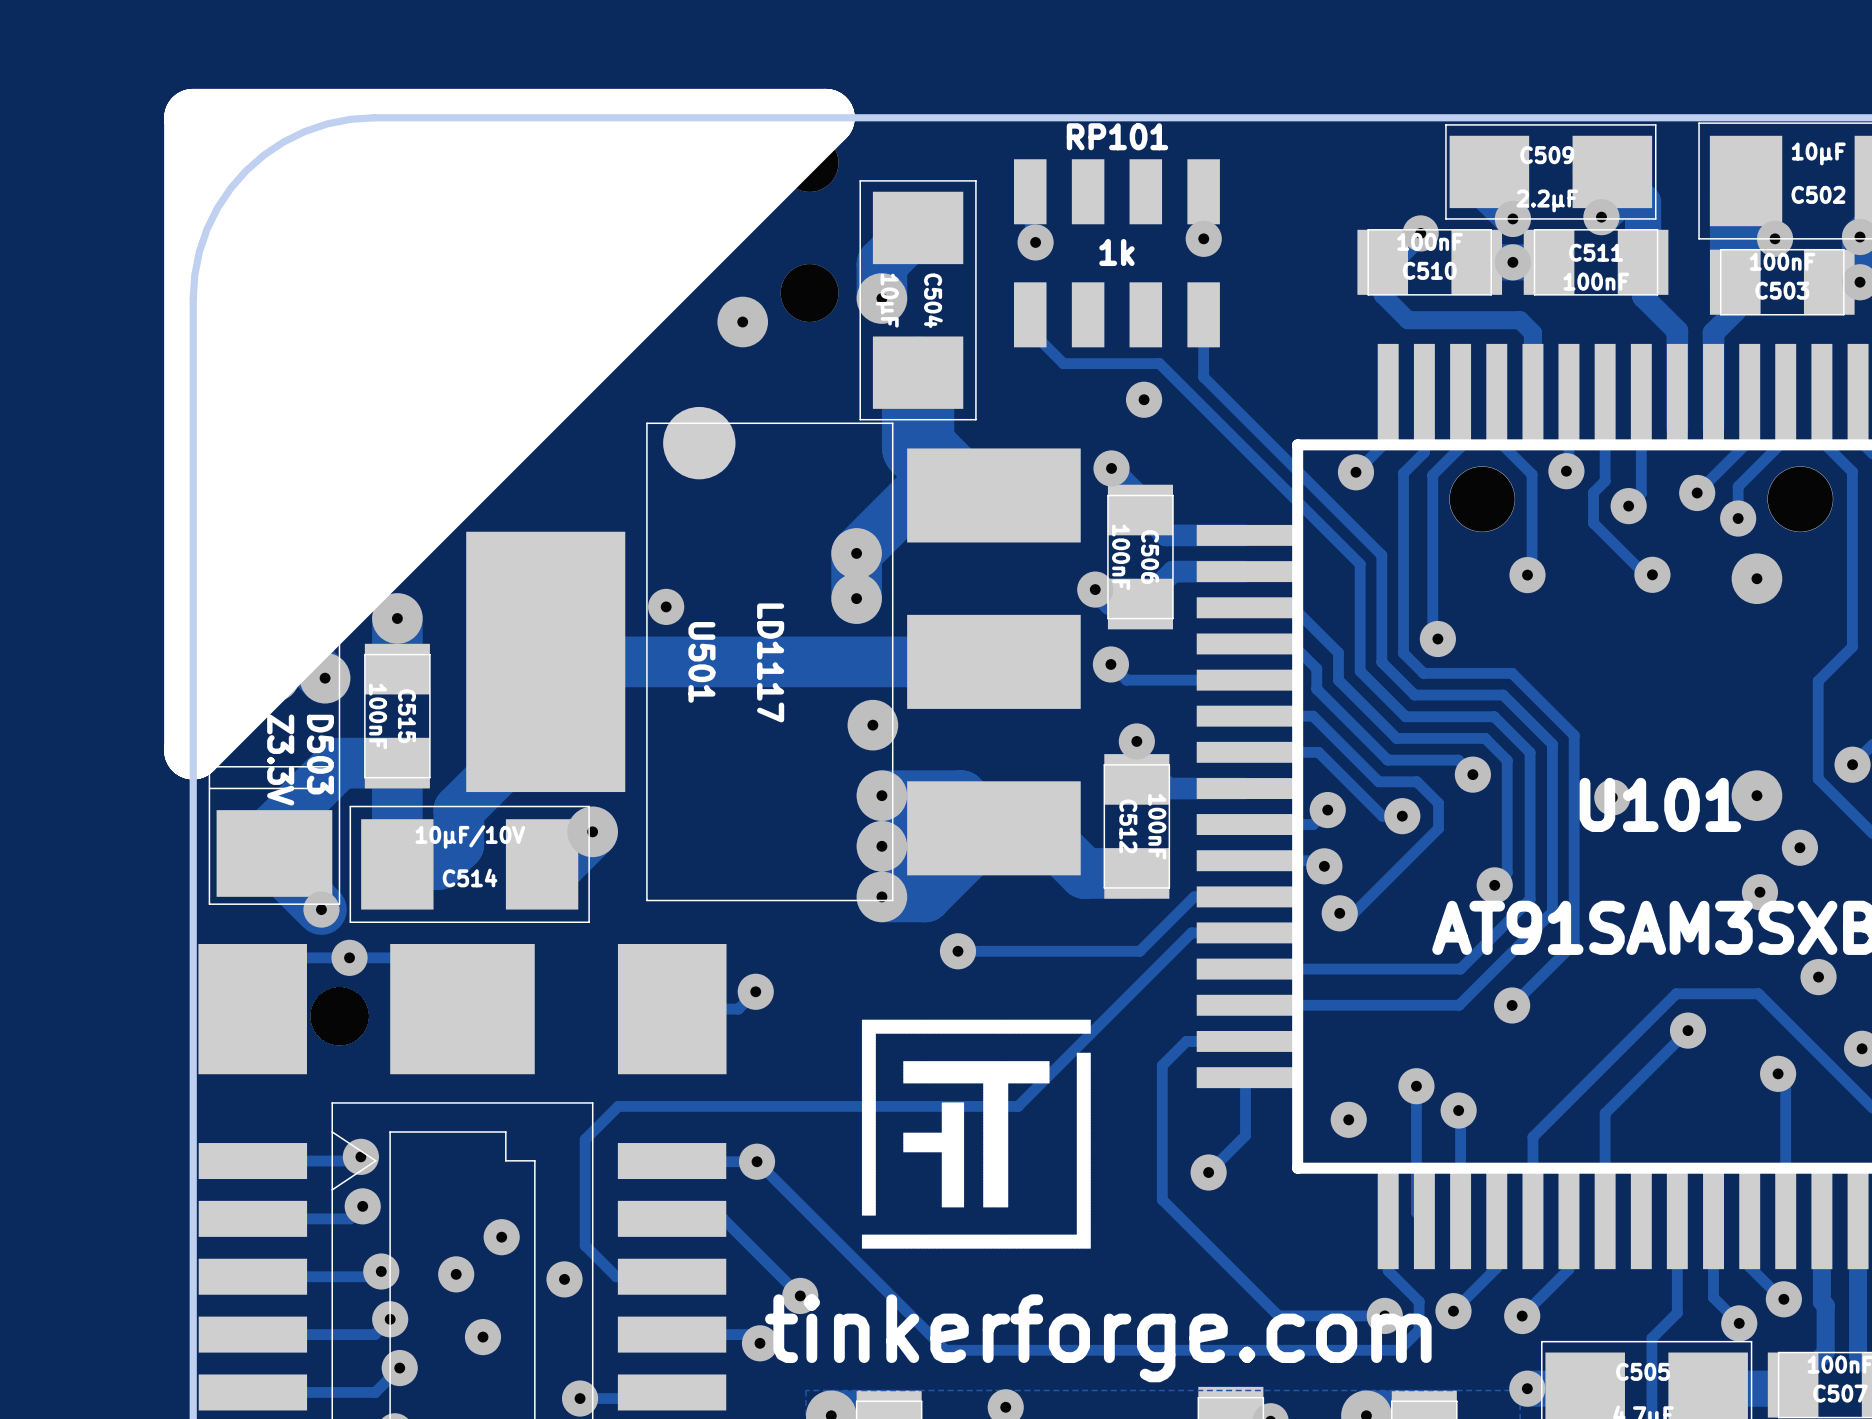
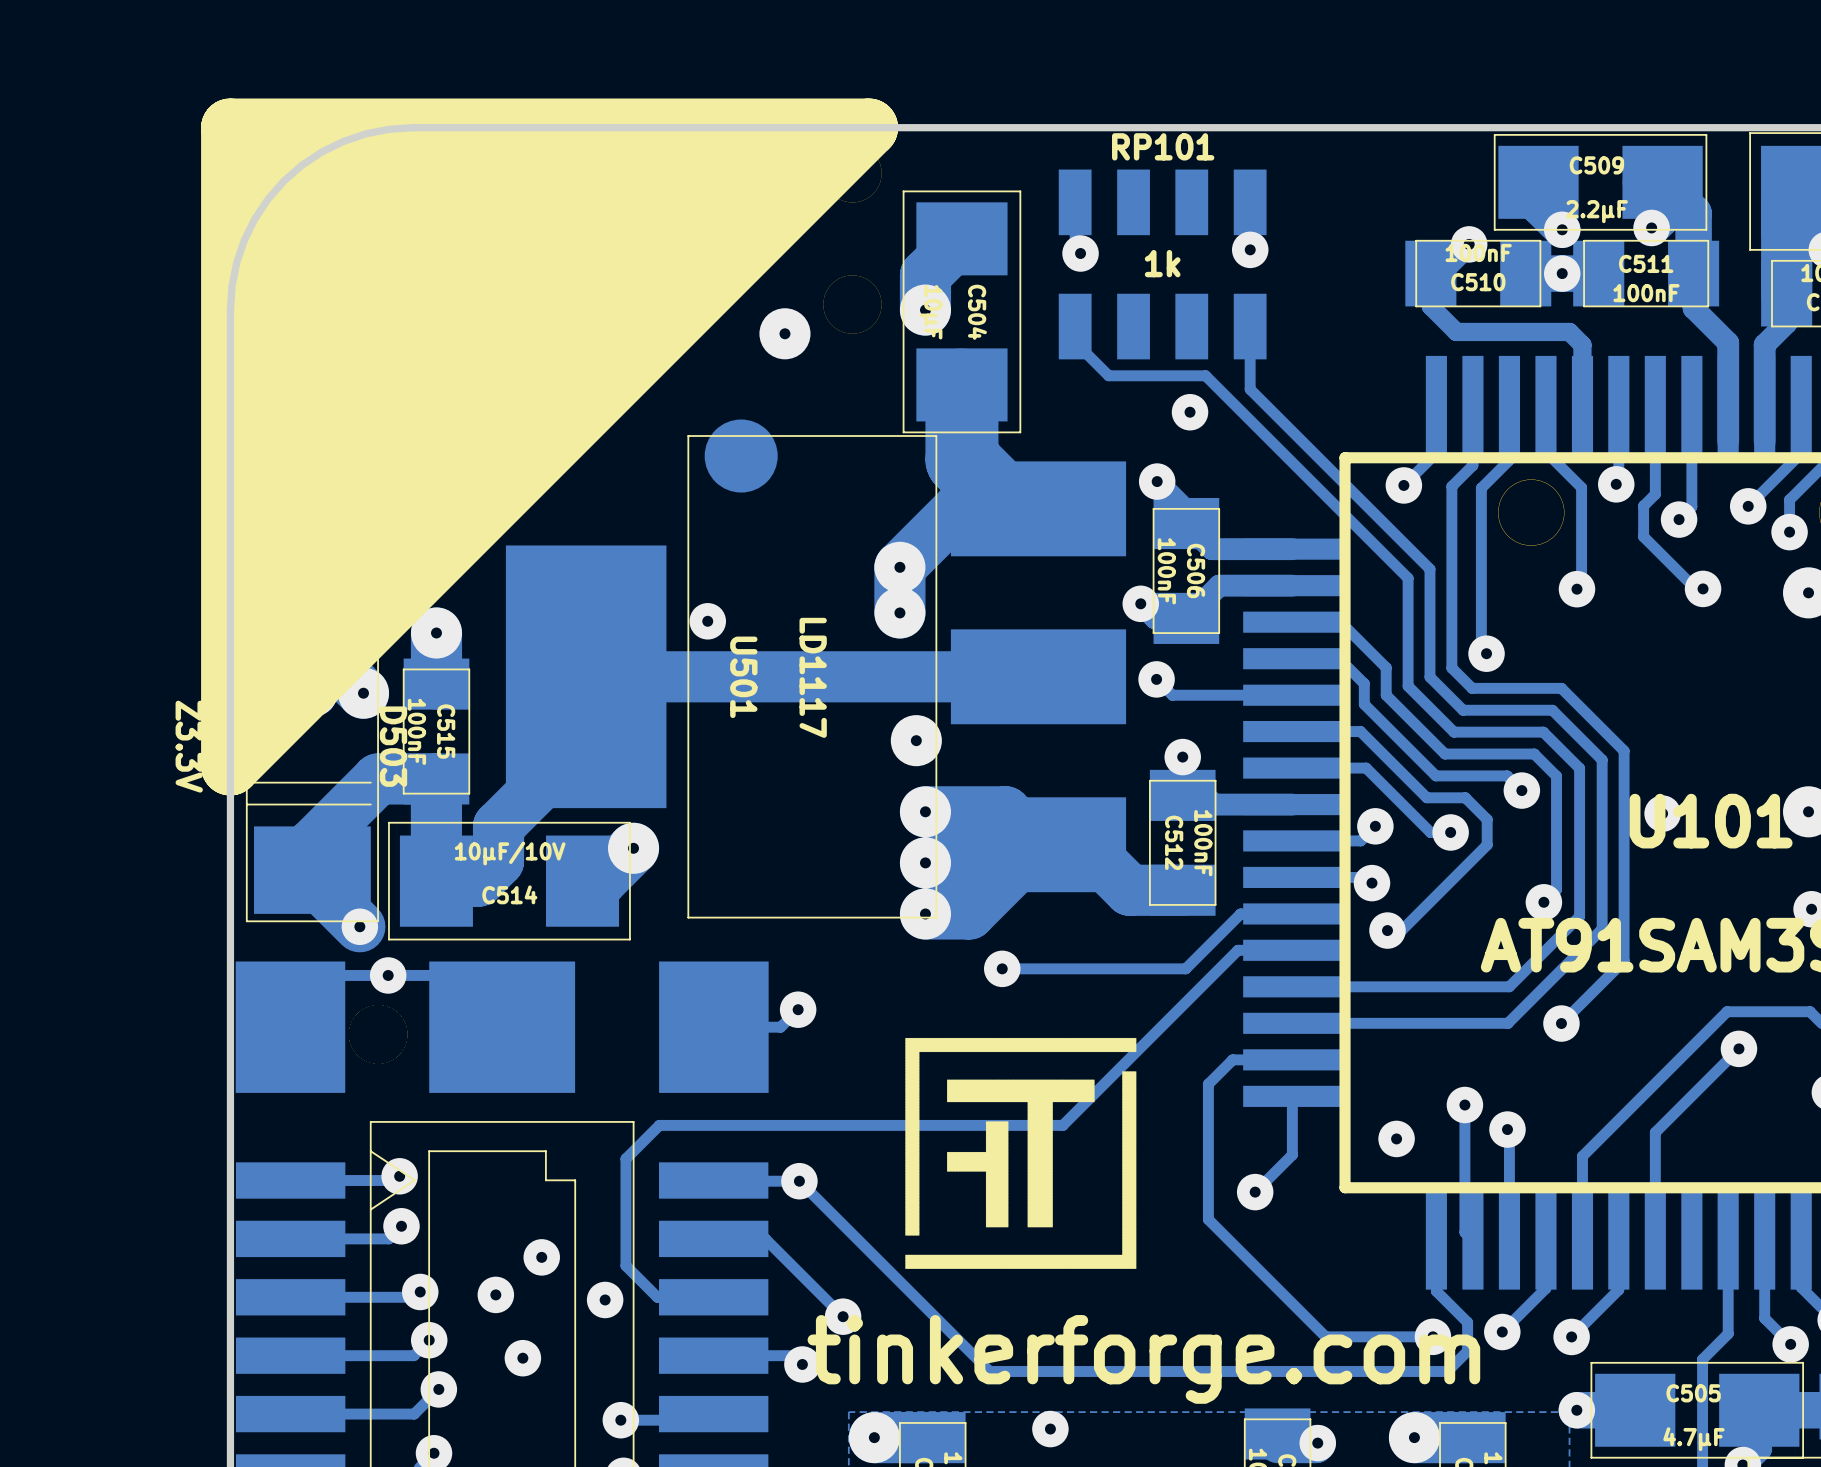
D503 name position: D503 (320, 754) -> D503 (393, 746)
D503 value position: Z3.3V (280, 760) -> Z3.3V (189, 746)

